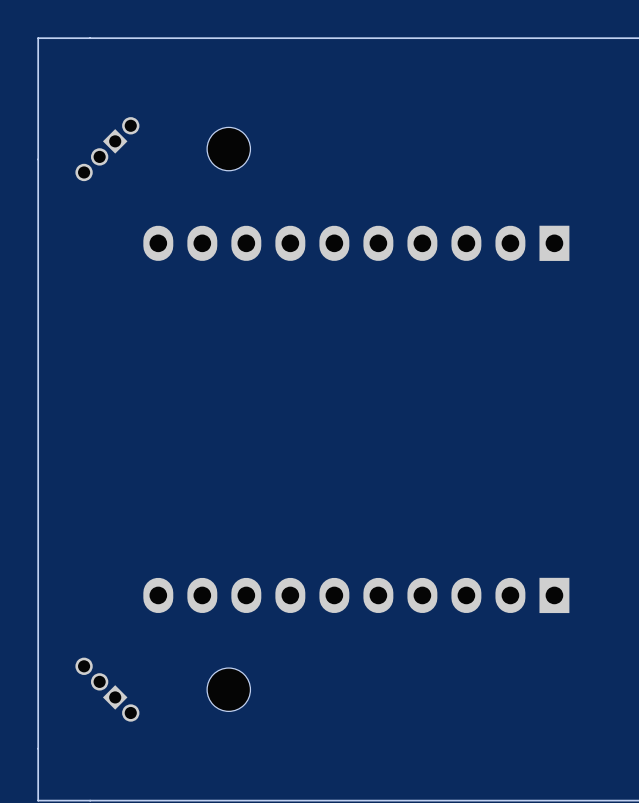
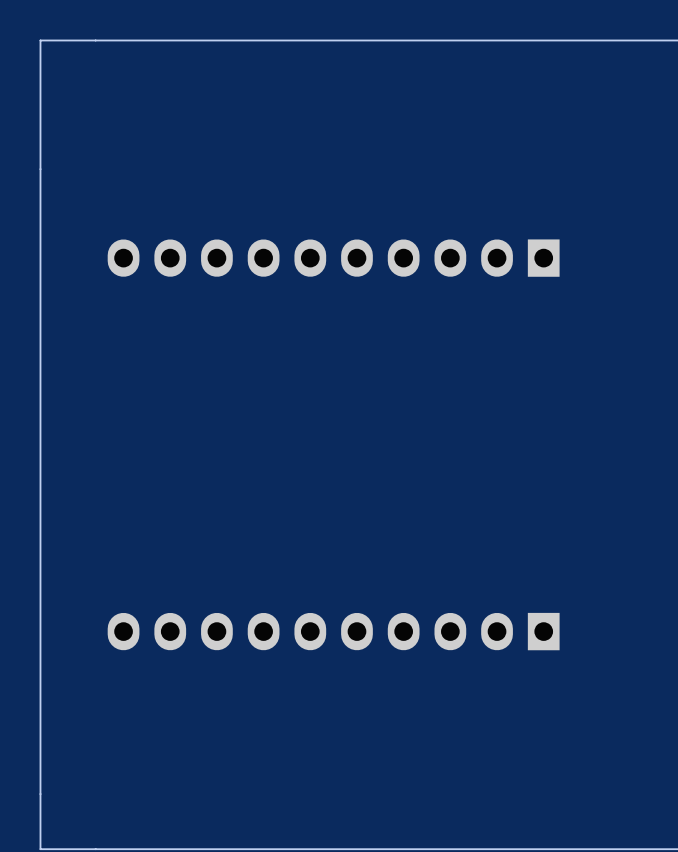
part: (107, 149) -> none
part: (228, 149) -> none
part position: (356, 243) -> (333, 258)
part position: (356, 595) -> (333, 631)
part: (107, 689) -> none
part: (228, 689) -> none

